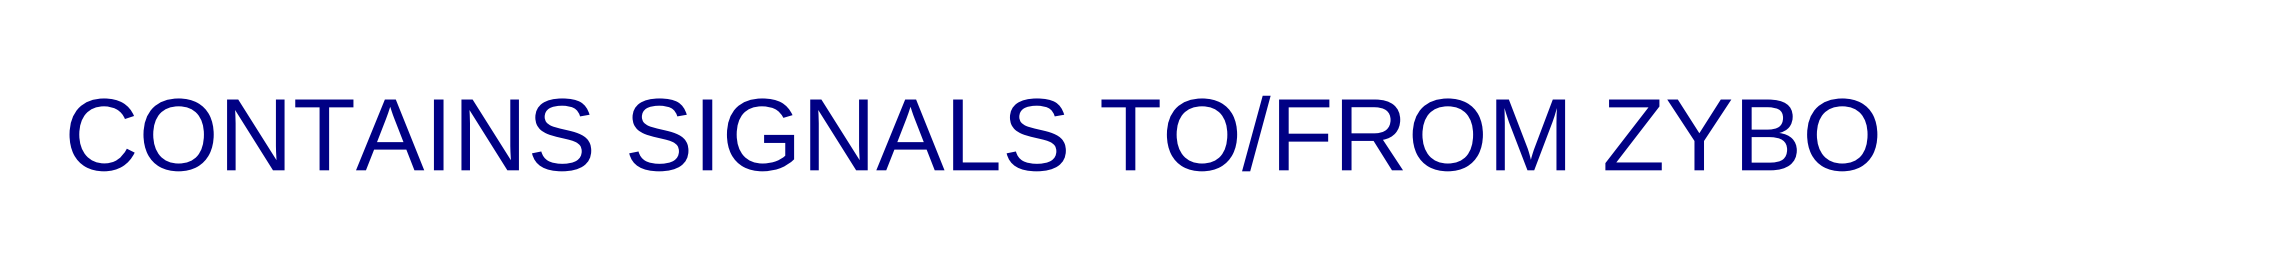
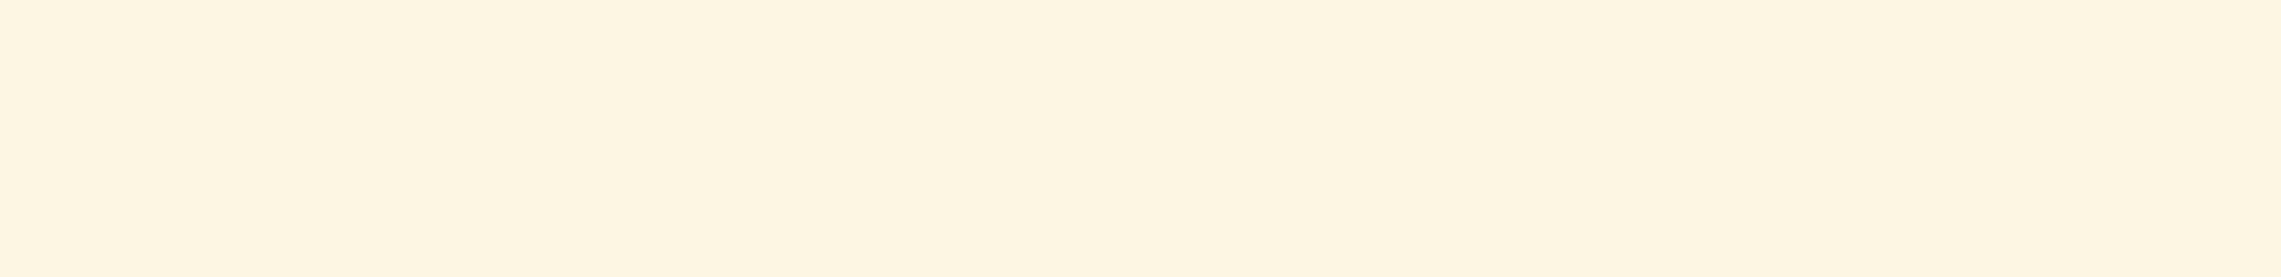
text: CONTAINS SIGNALS TO/FROM ZYBO (973, 133) -> none

